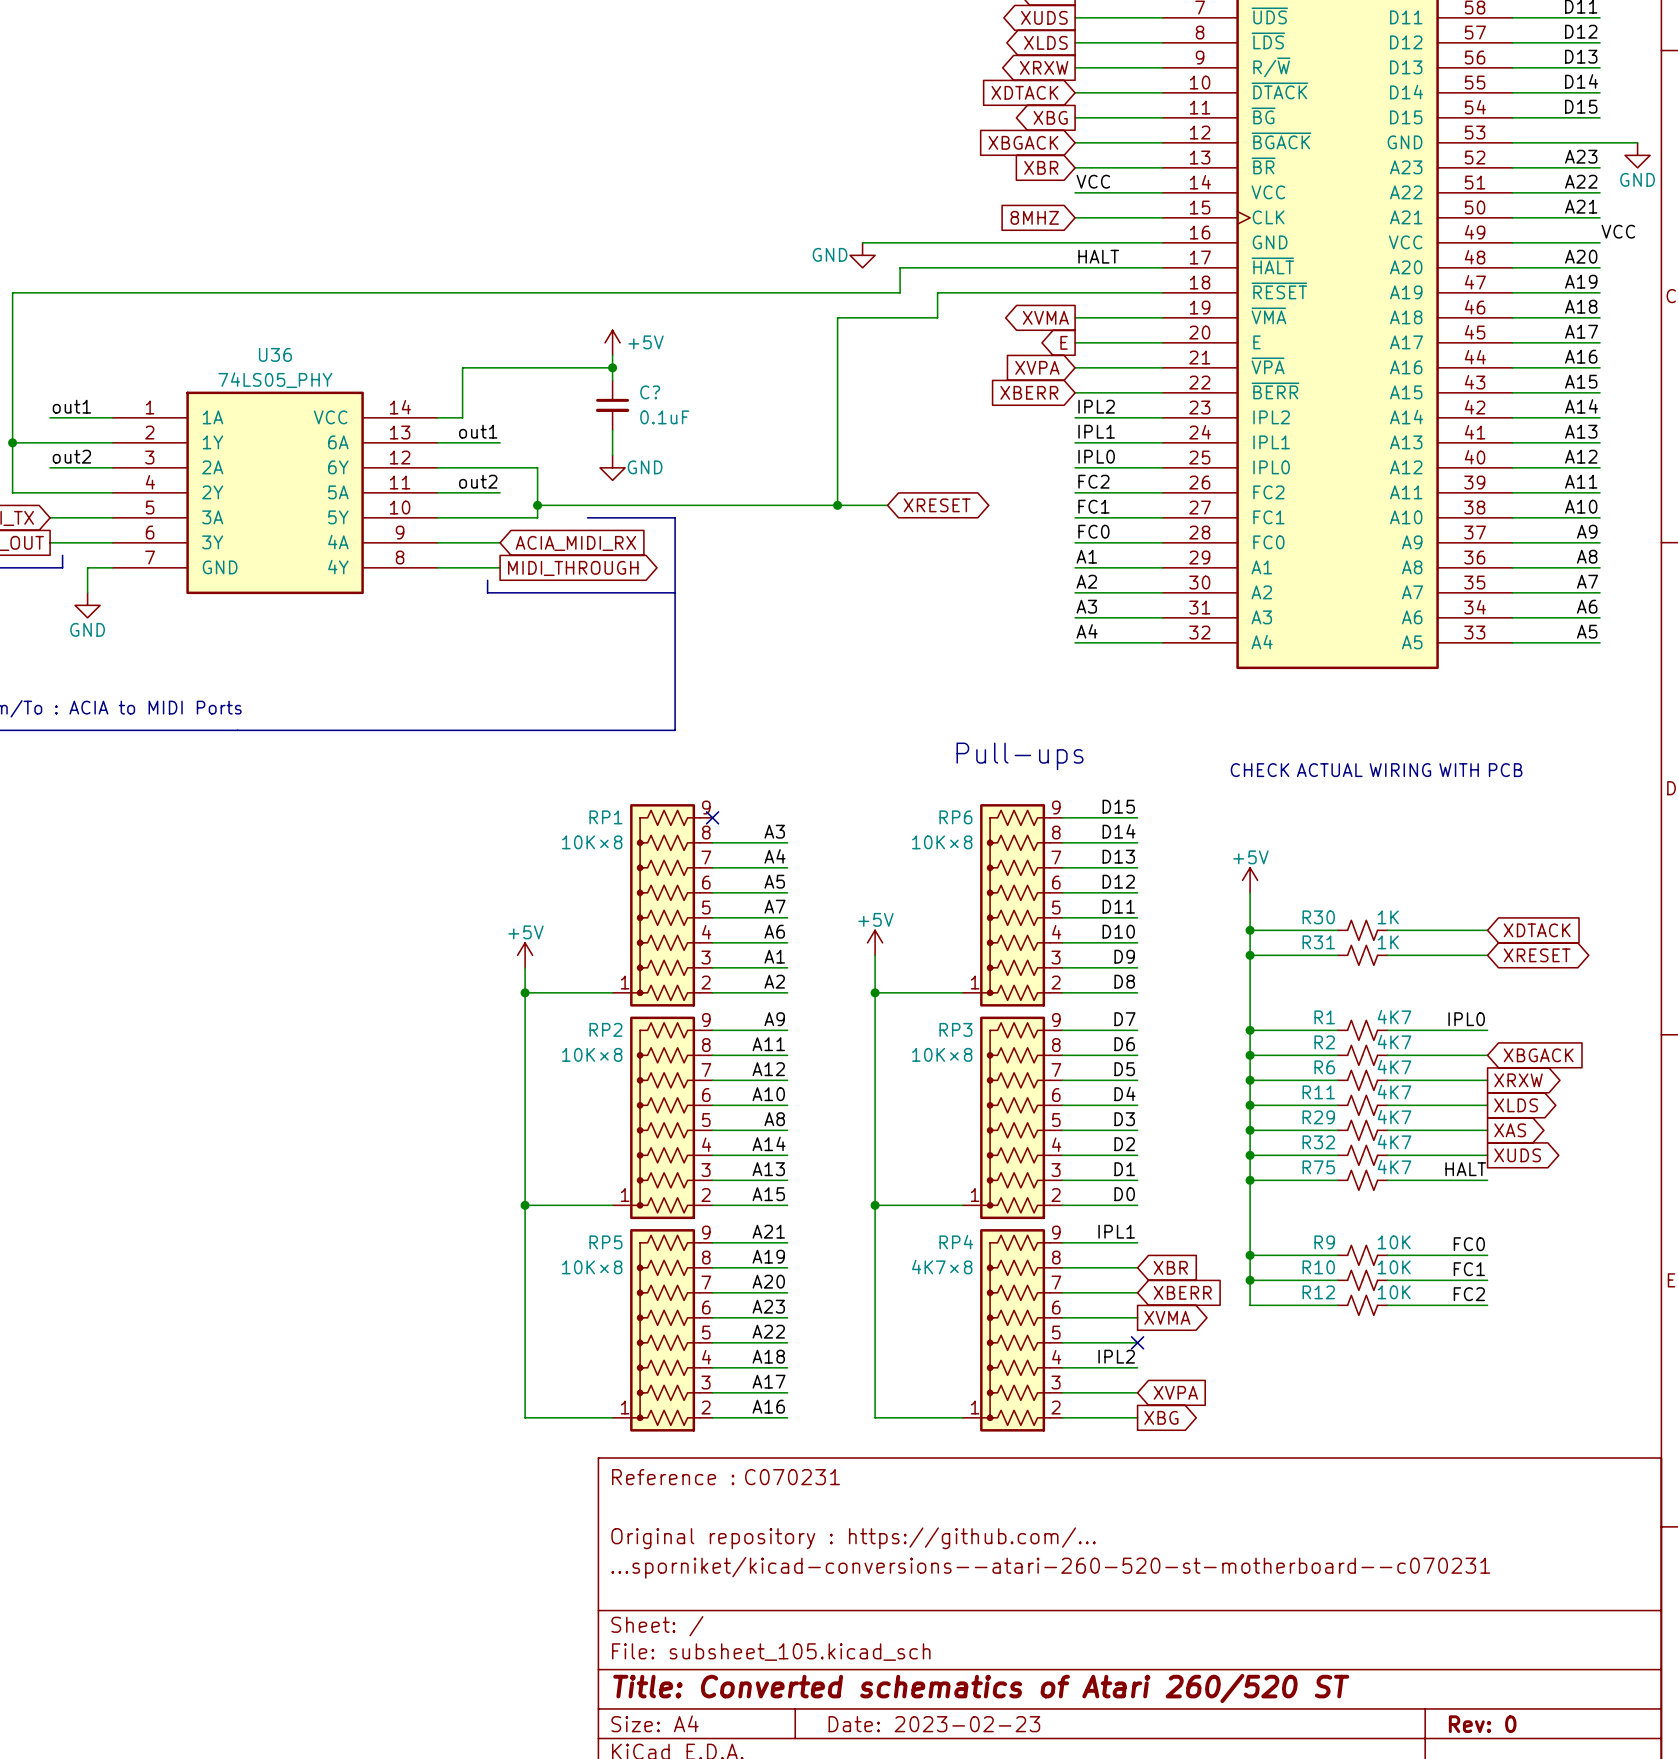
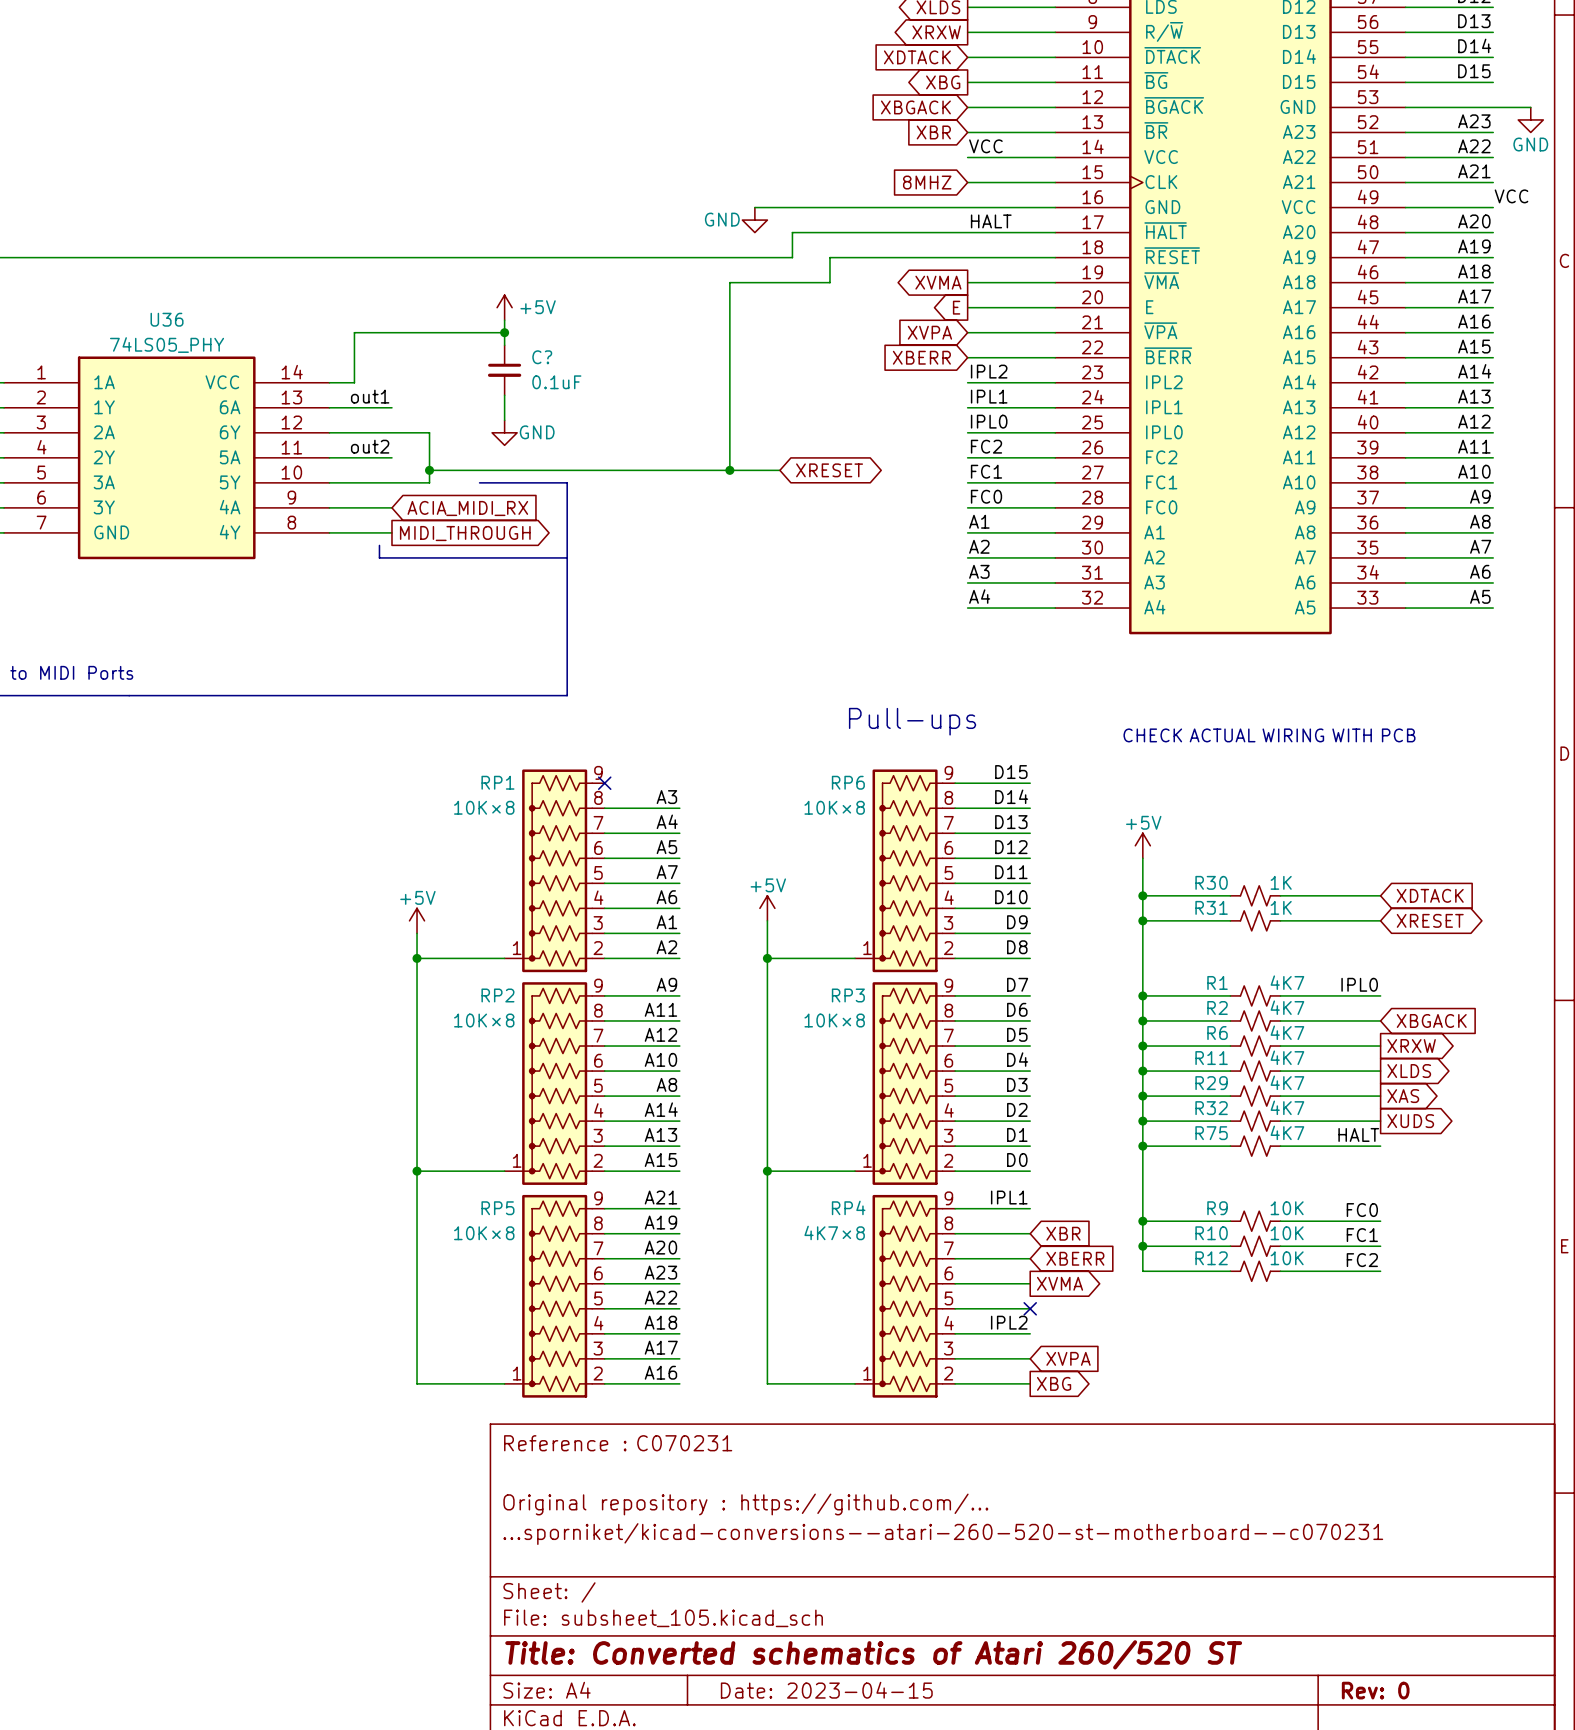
title block: Date: 2023-02-23 (934, 1724) -> Date: 2023-04-15 (826, 1690)

